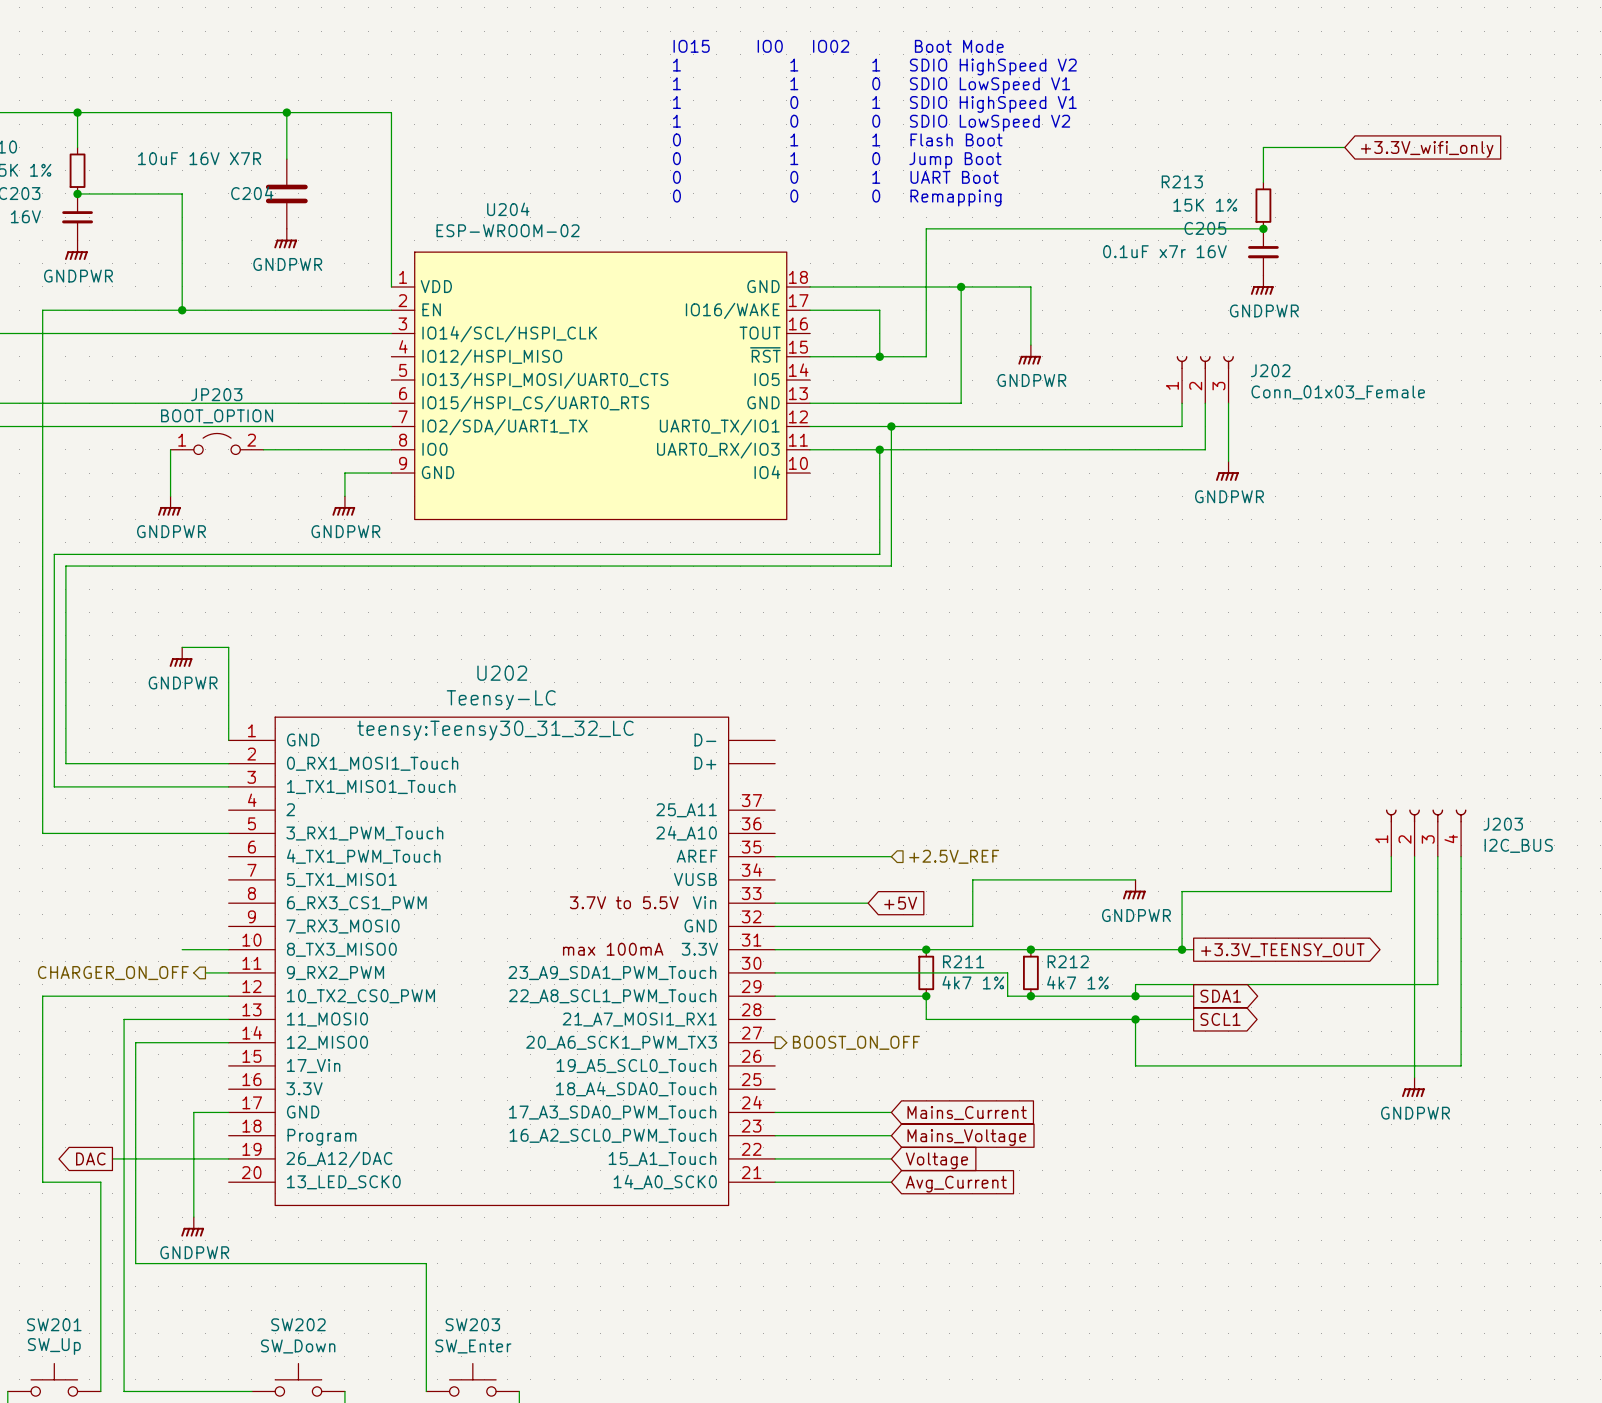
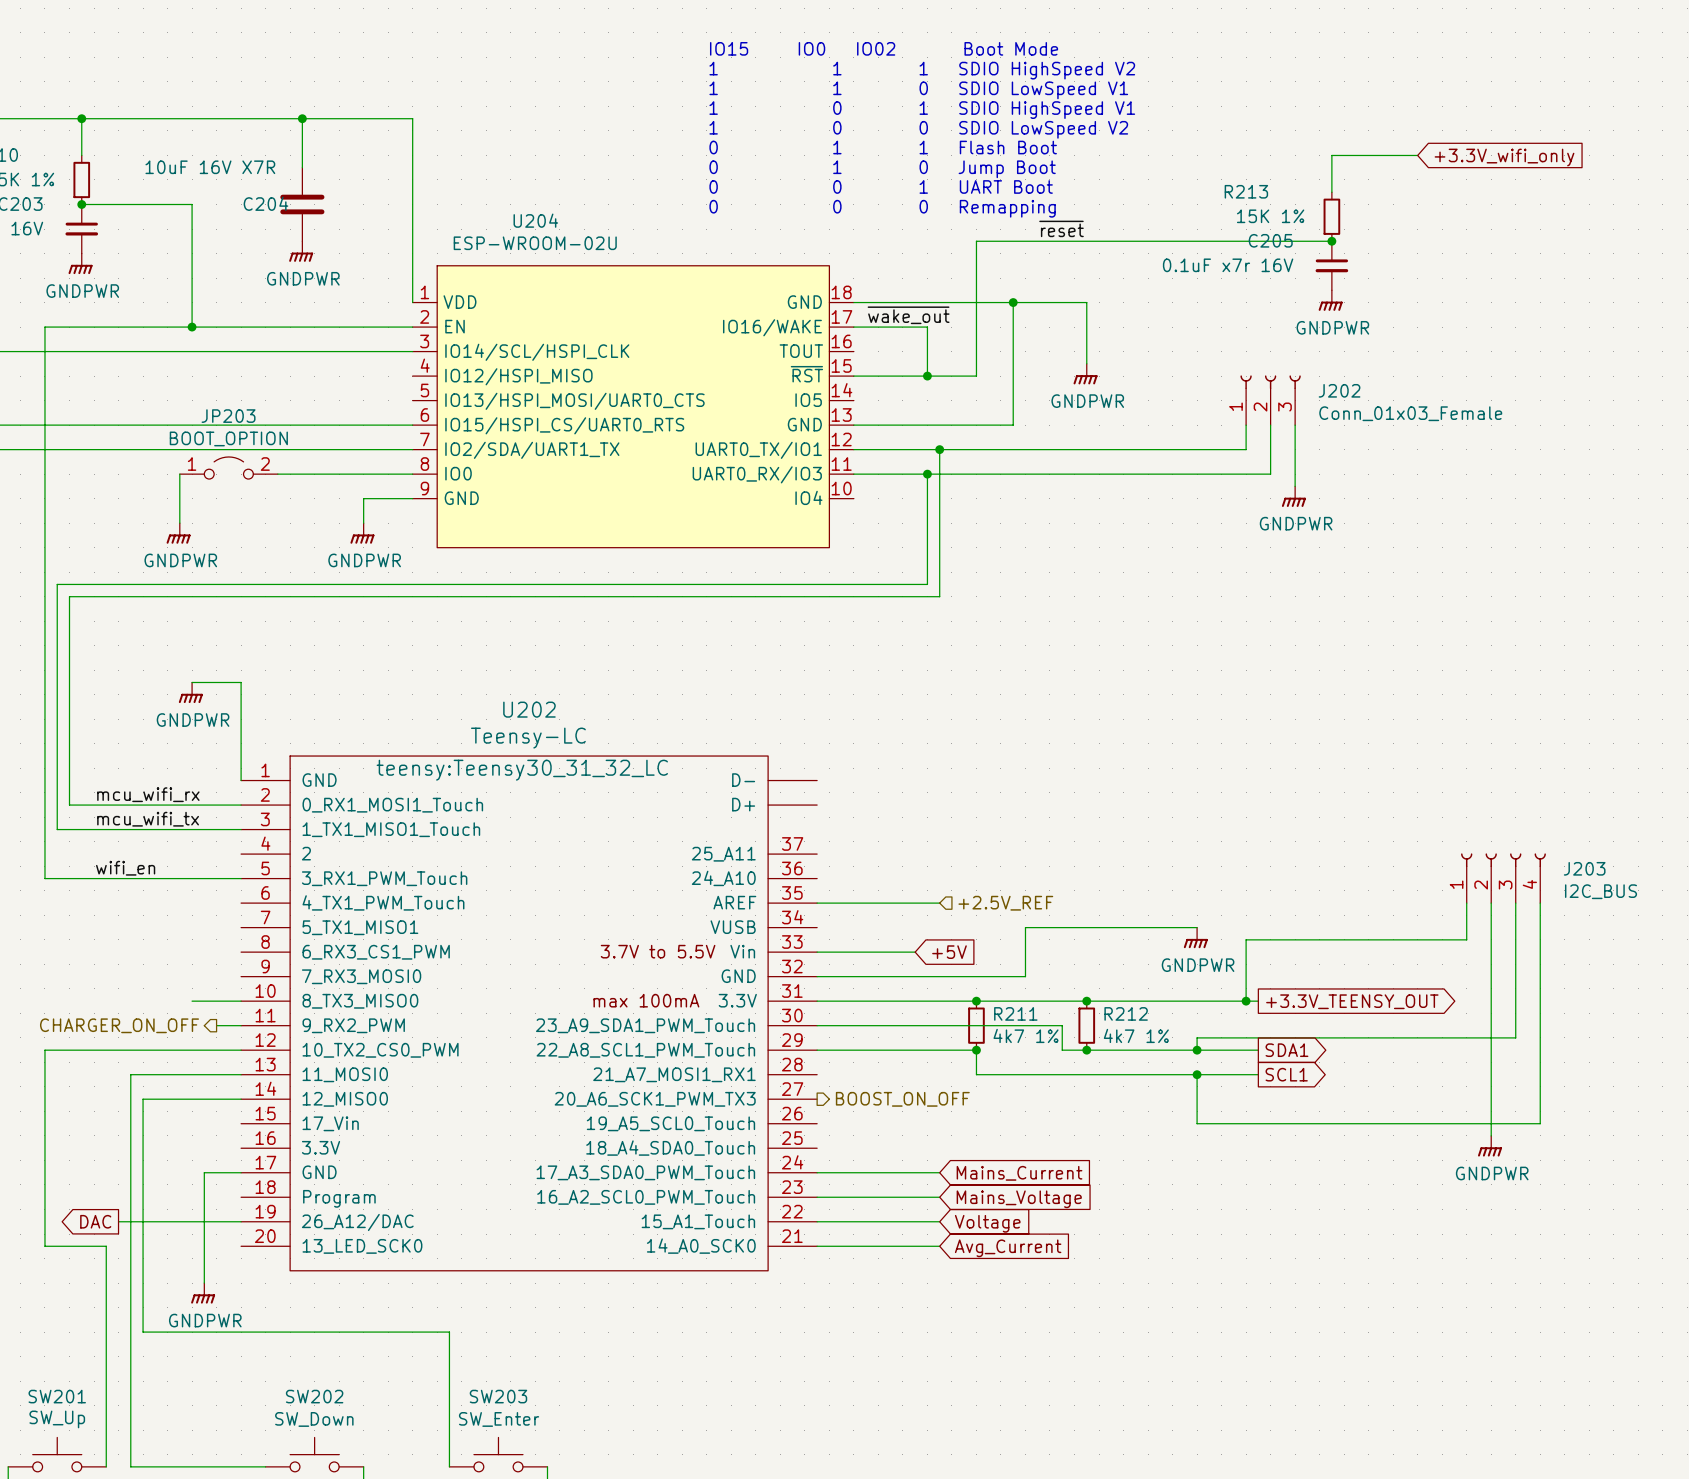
label: none -> ~{reset} (1061, 228)
U204 value: ESP-WROOM-02 (508, 230) -> ESP-WROOM-02U (535, 243)
label: none -> ~{wake_out} (908, 315)
label: none -> mcu_wifi_rx (148, 794)
label: none -> mcu_wifi_tx (148, 819)
label: none -> wifi_en (125, 868)

